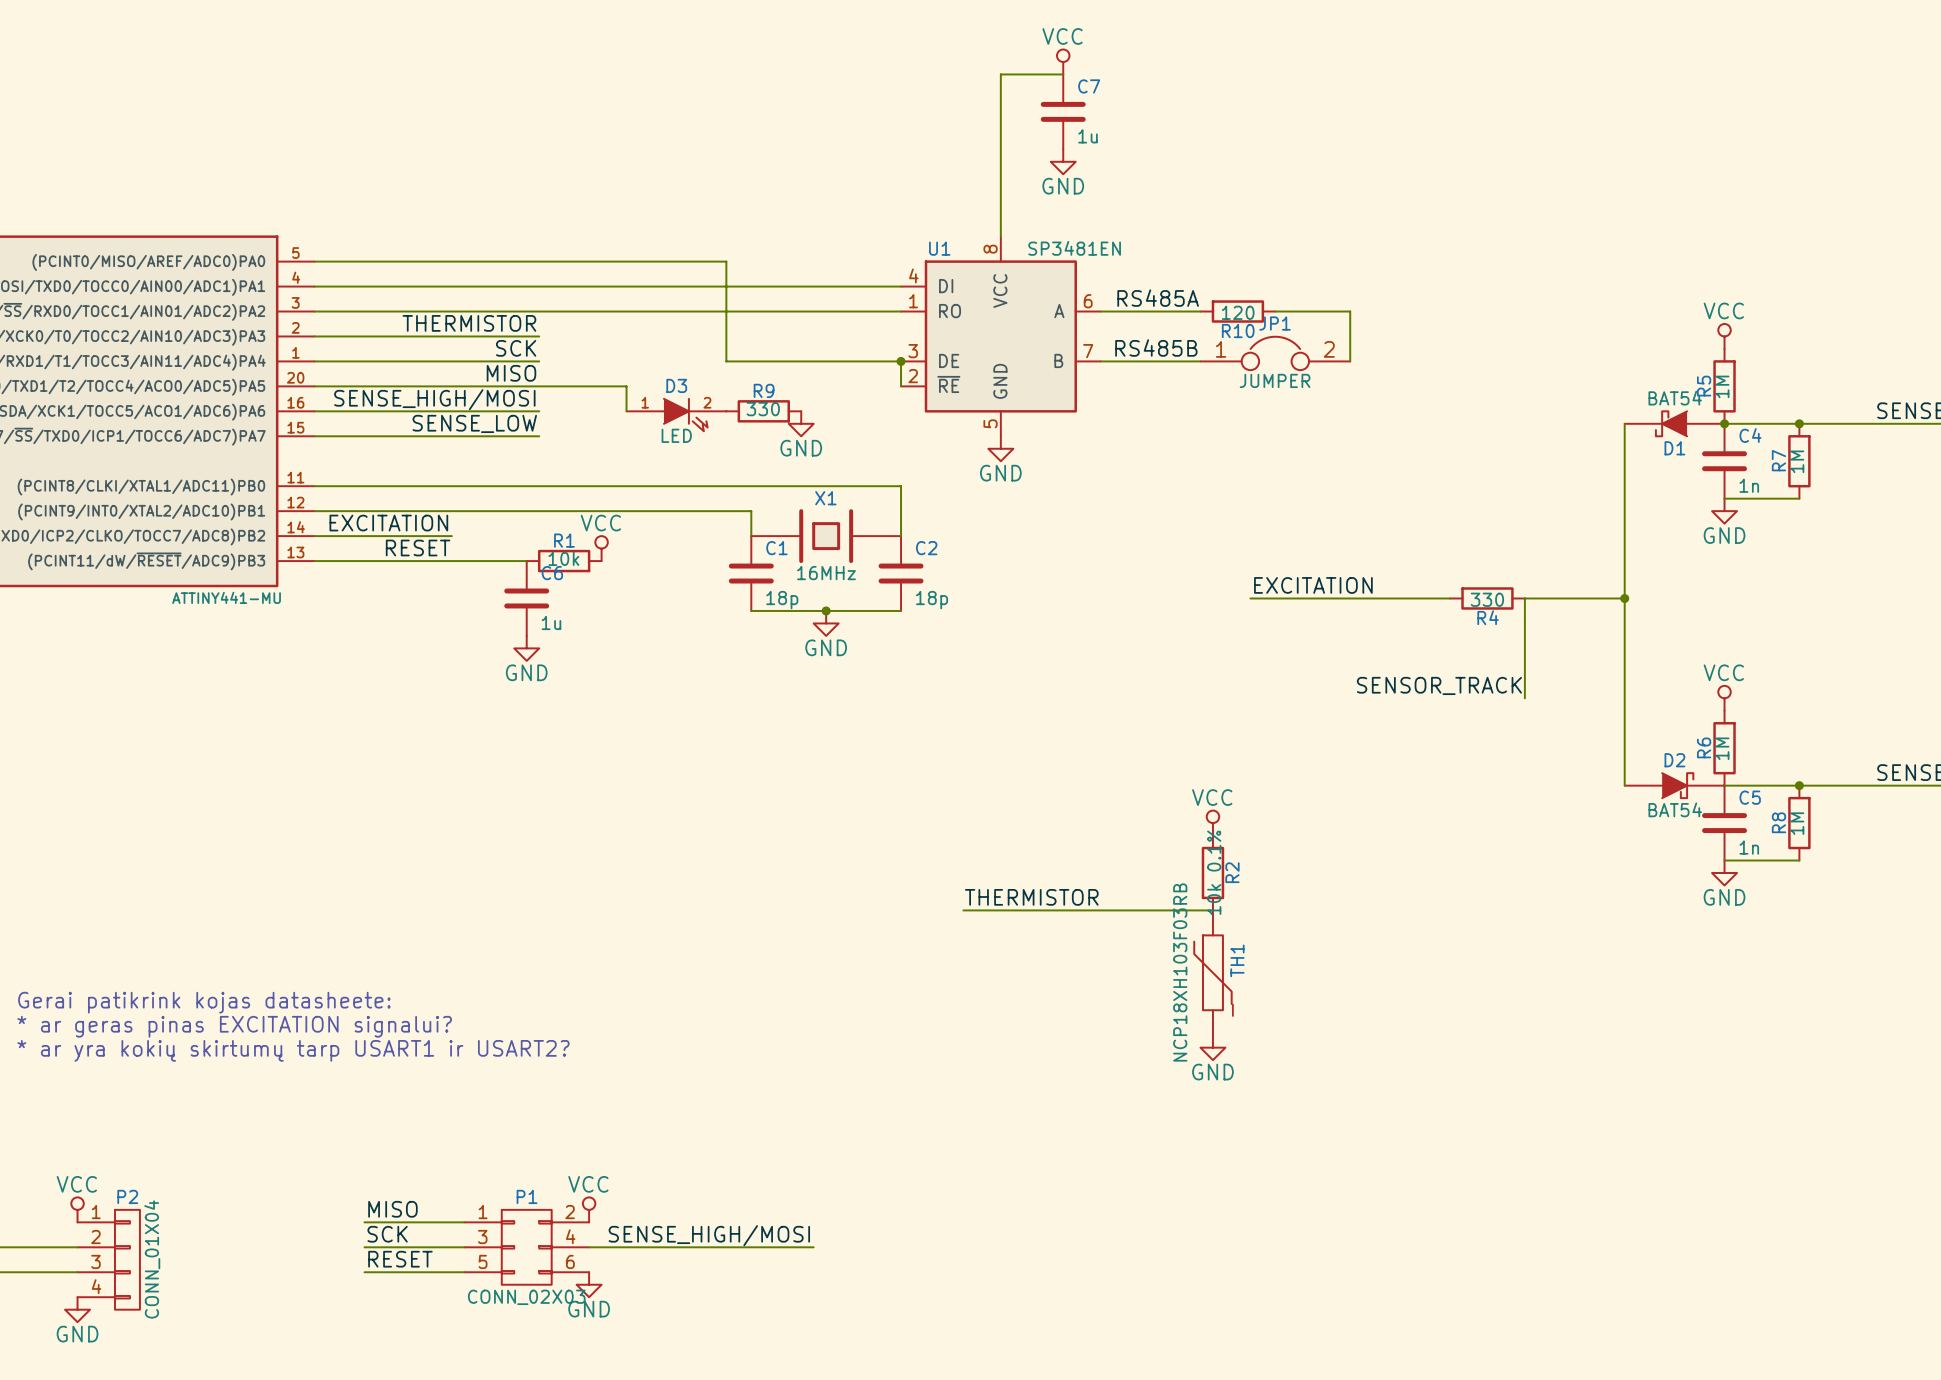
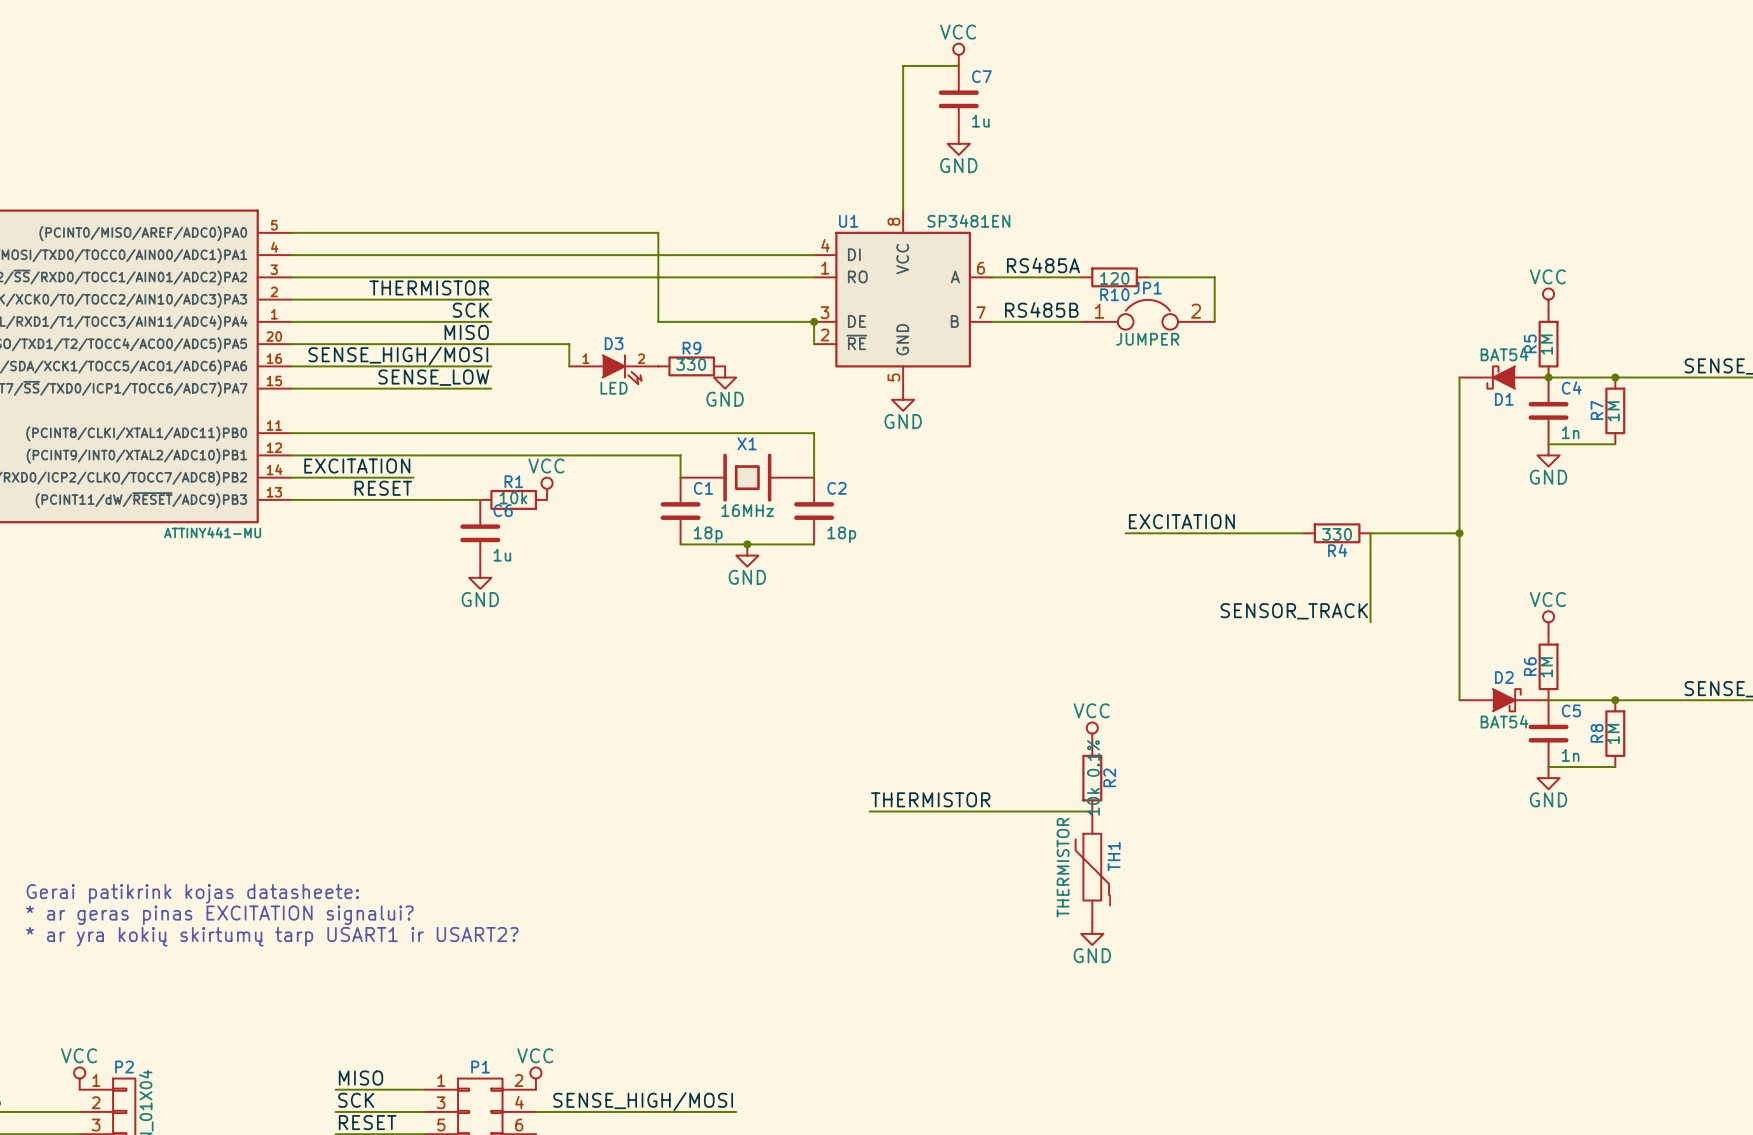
TH1 value: NCP18XH103F03RB (1180, 972) -> THERMISTOR (1063, 867)

